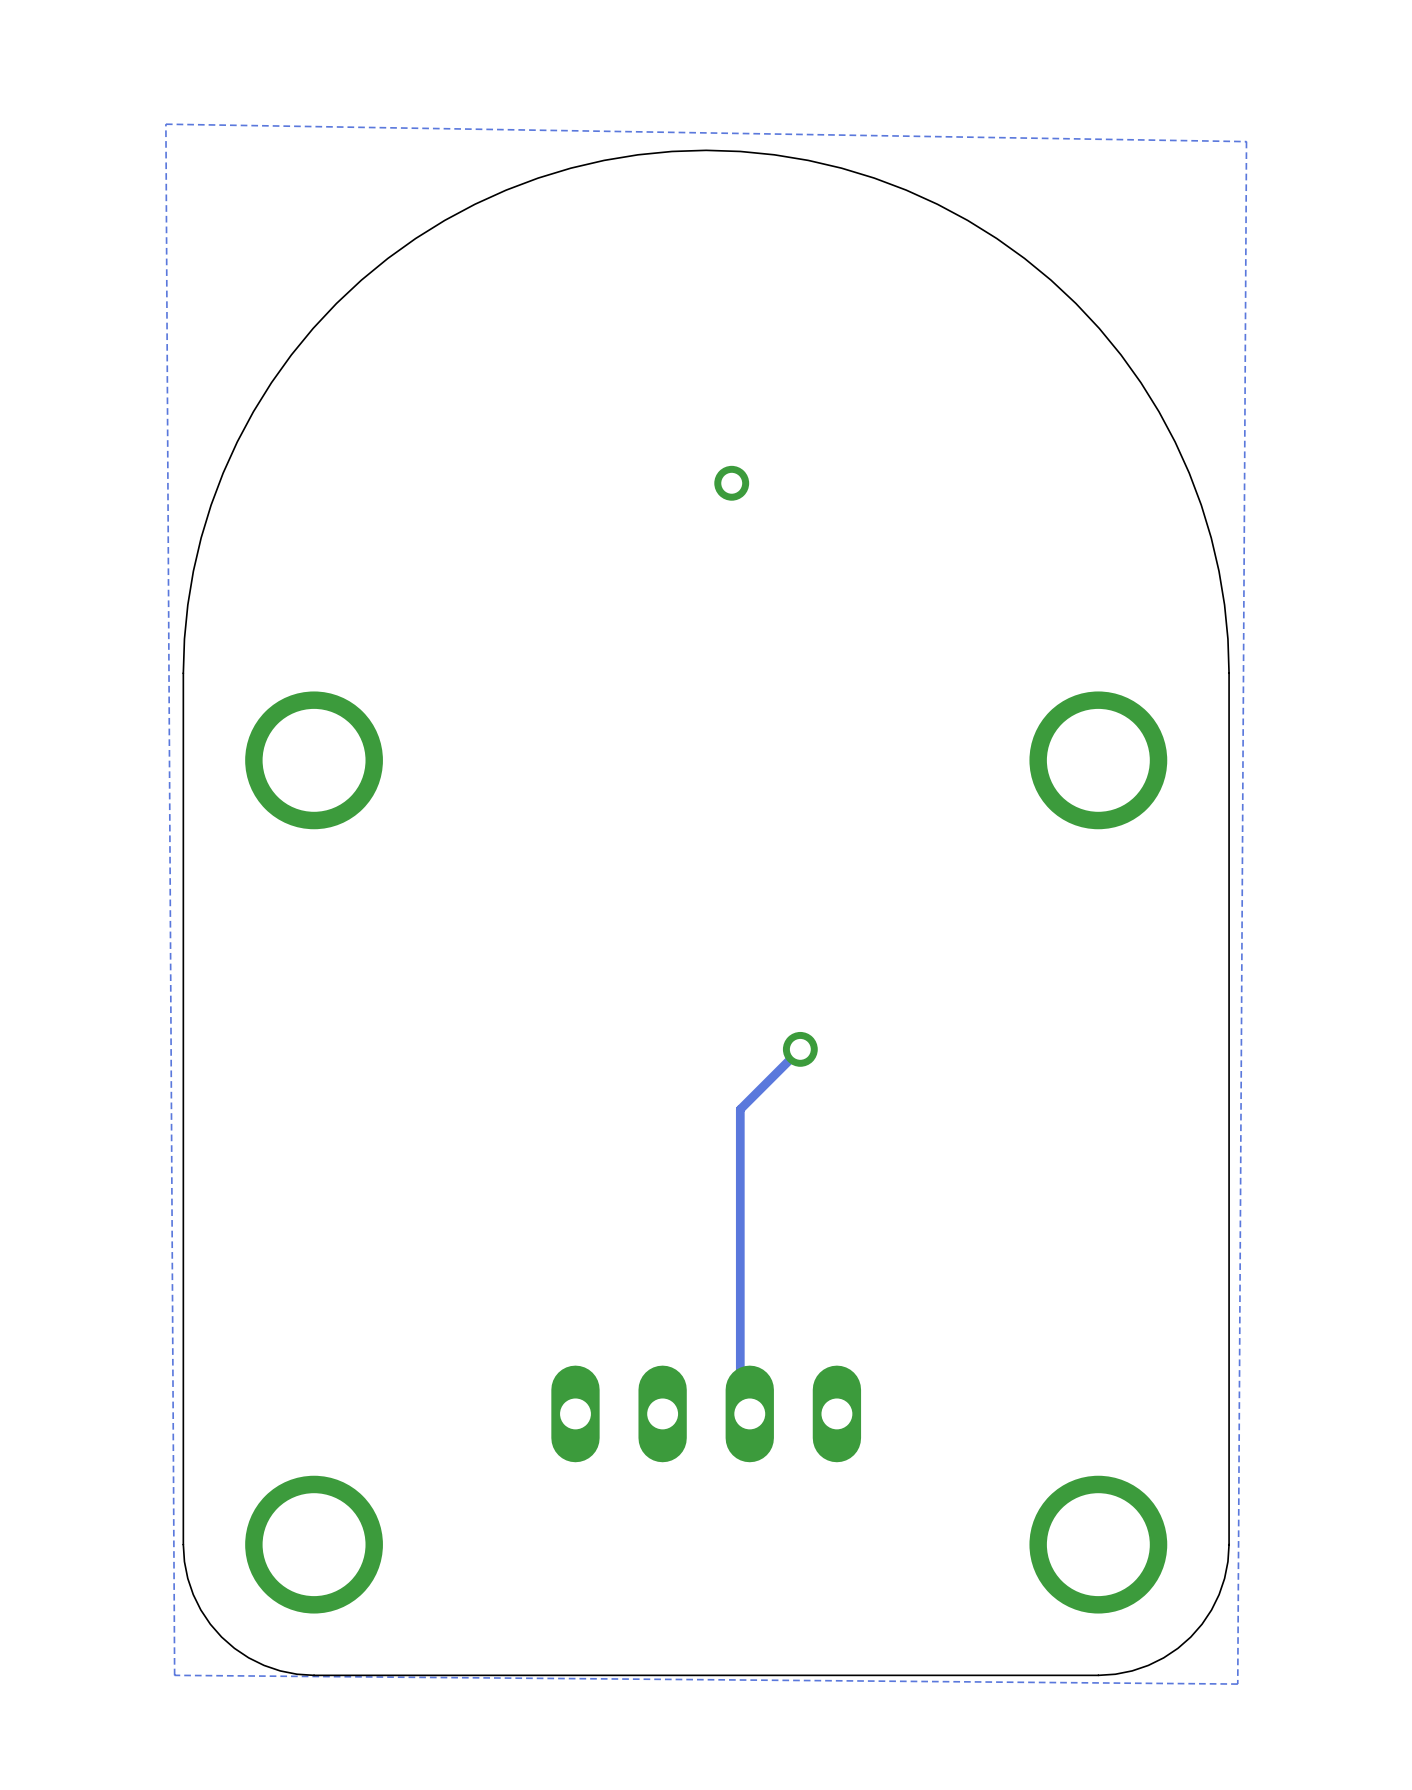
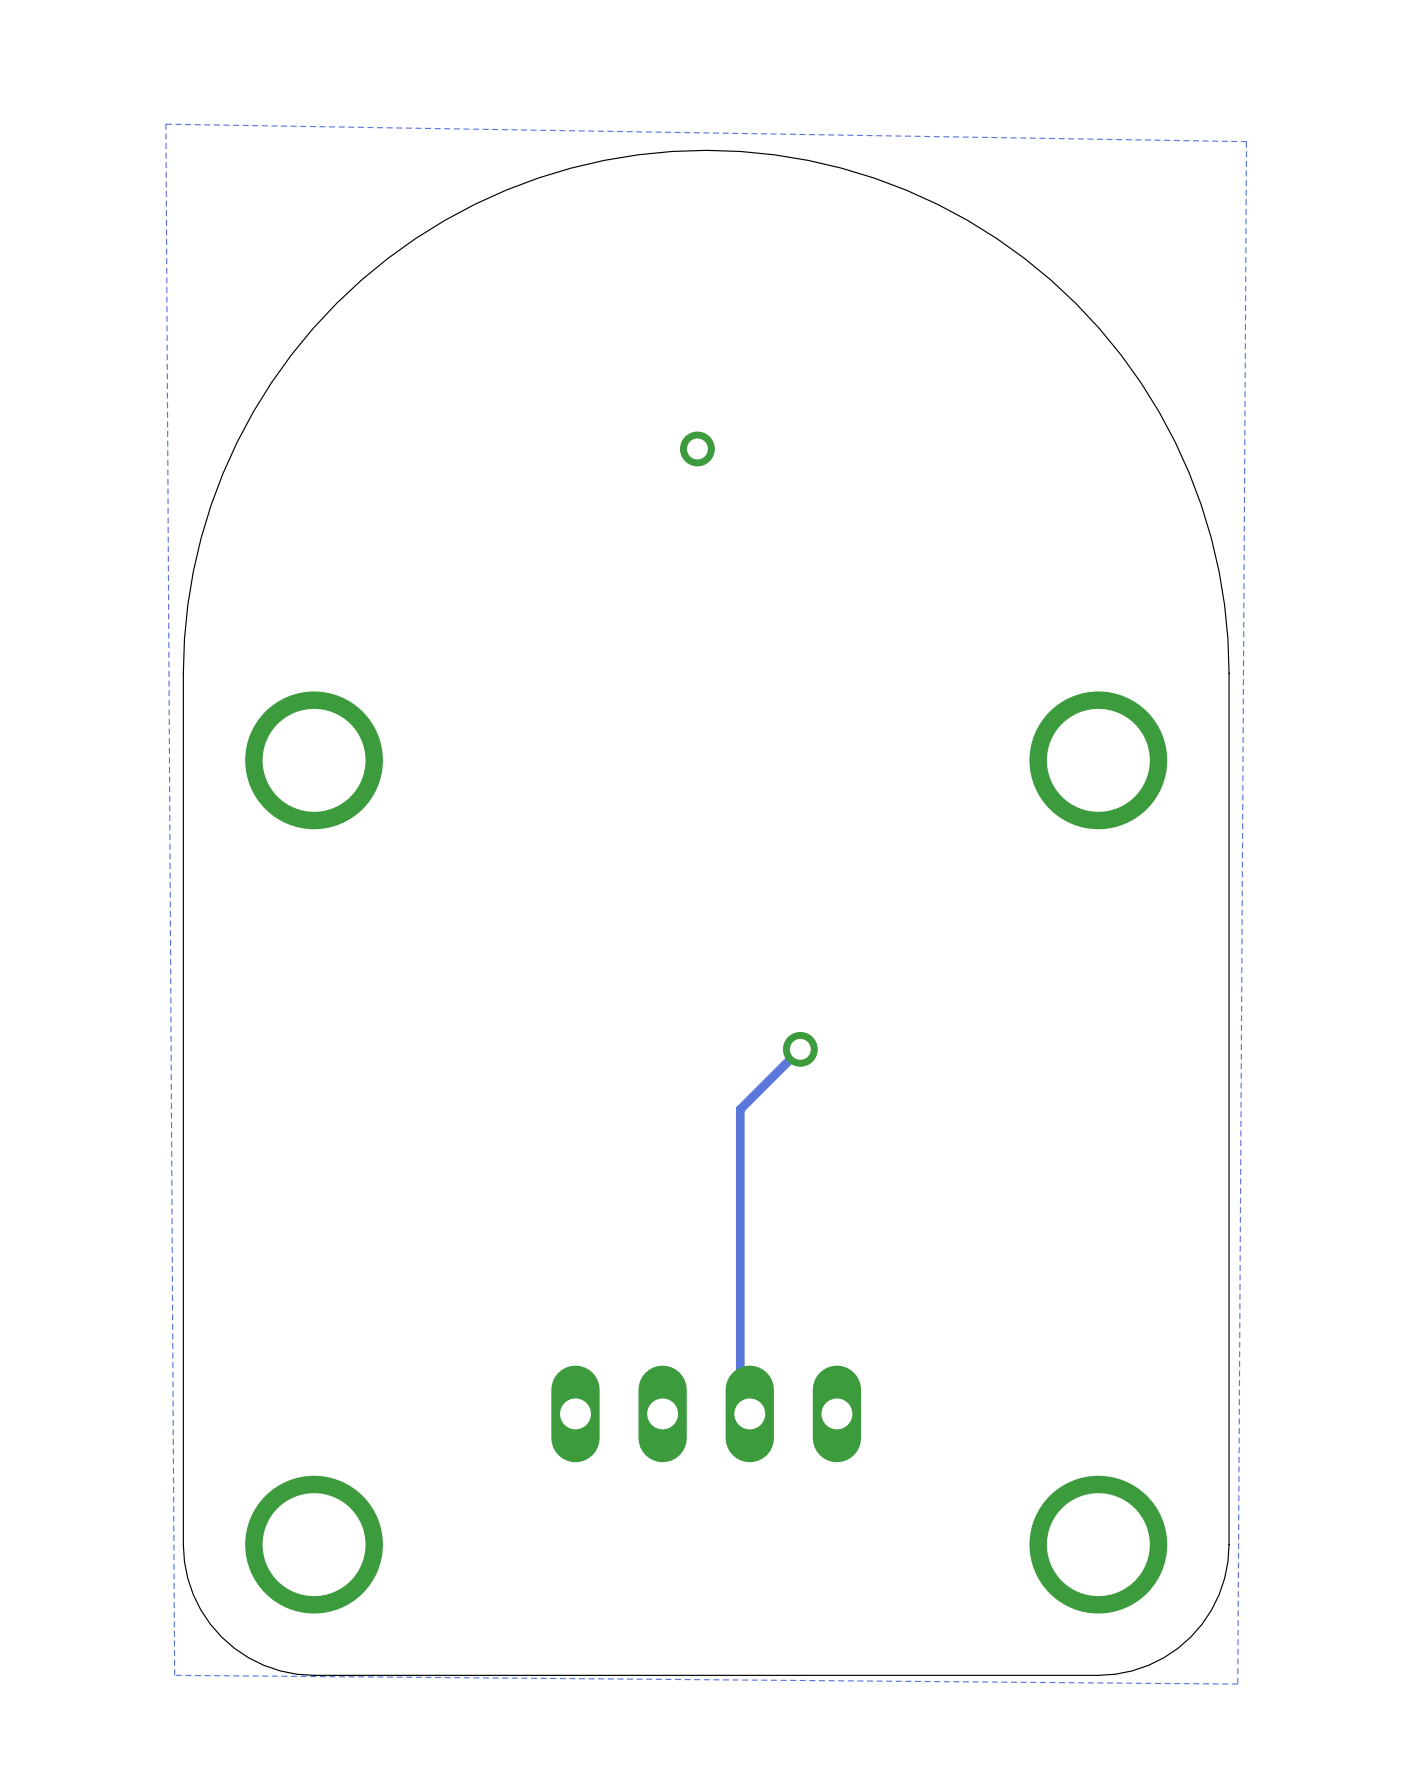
via position: (731, 483) -> (697, 448)

